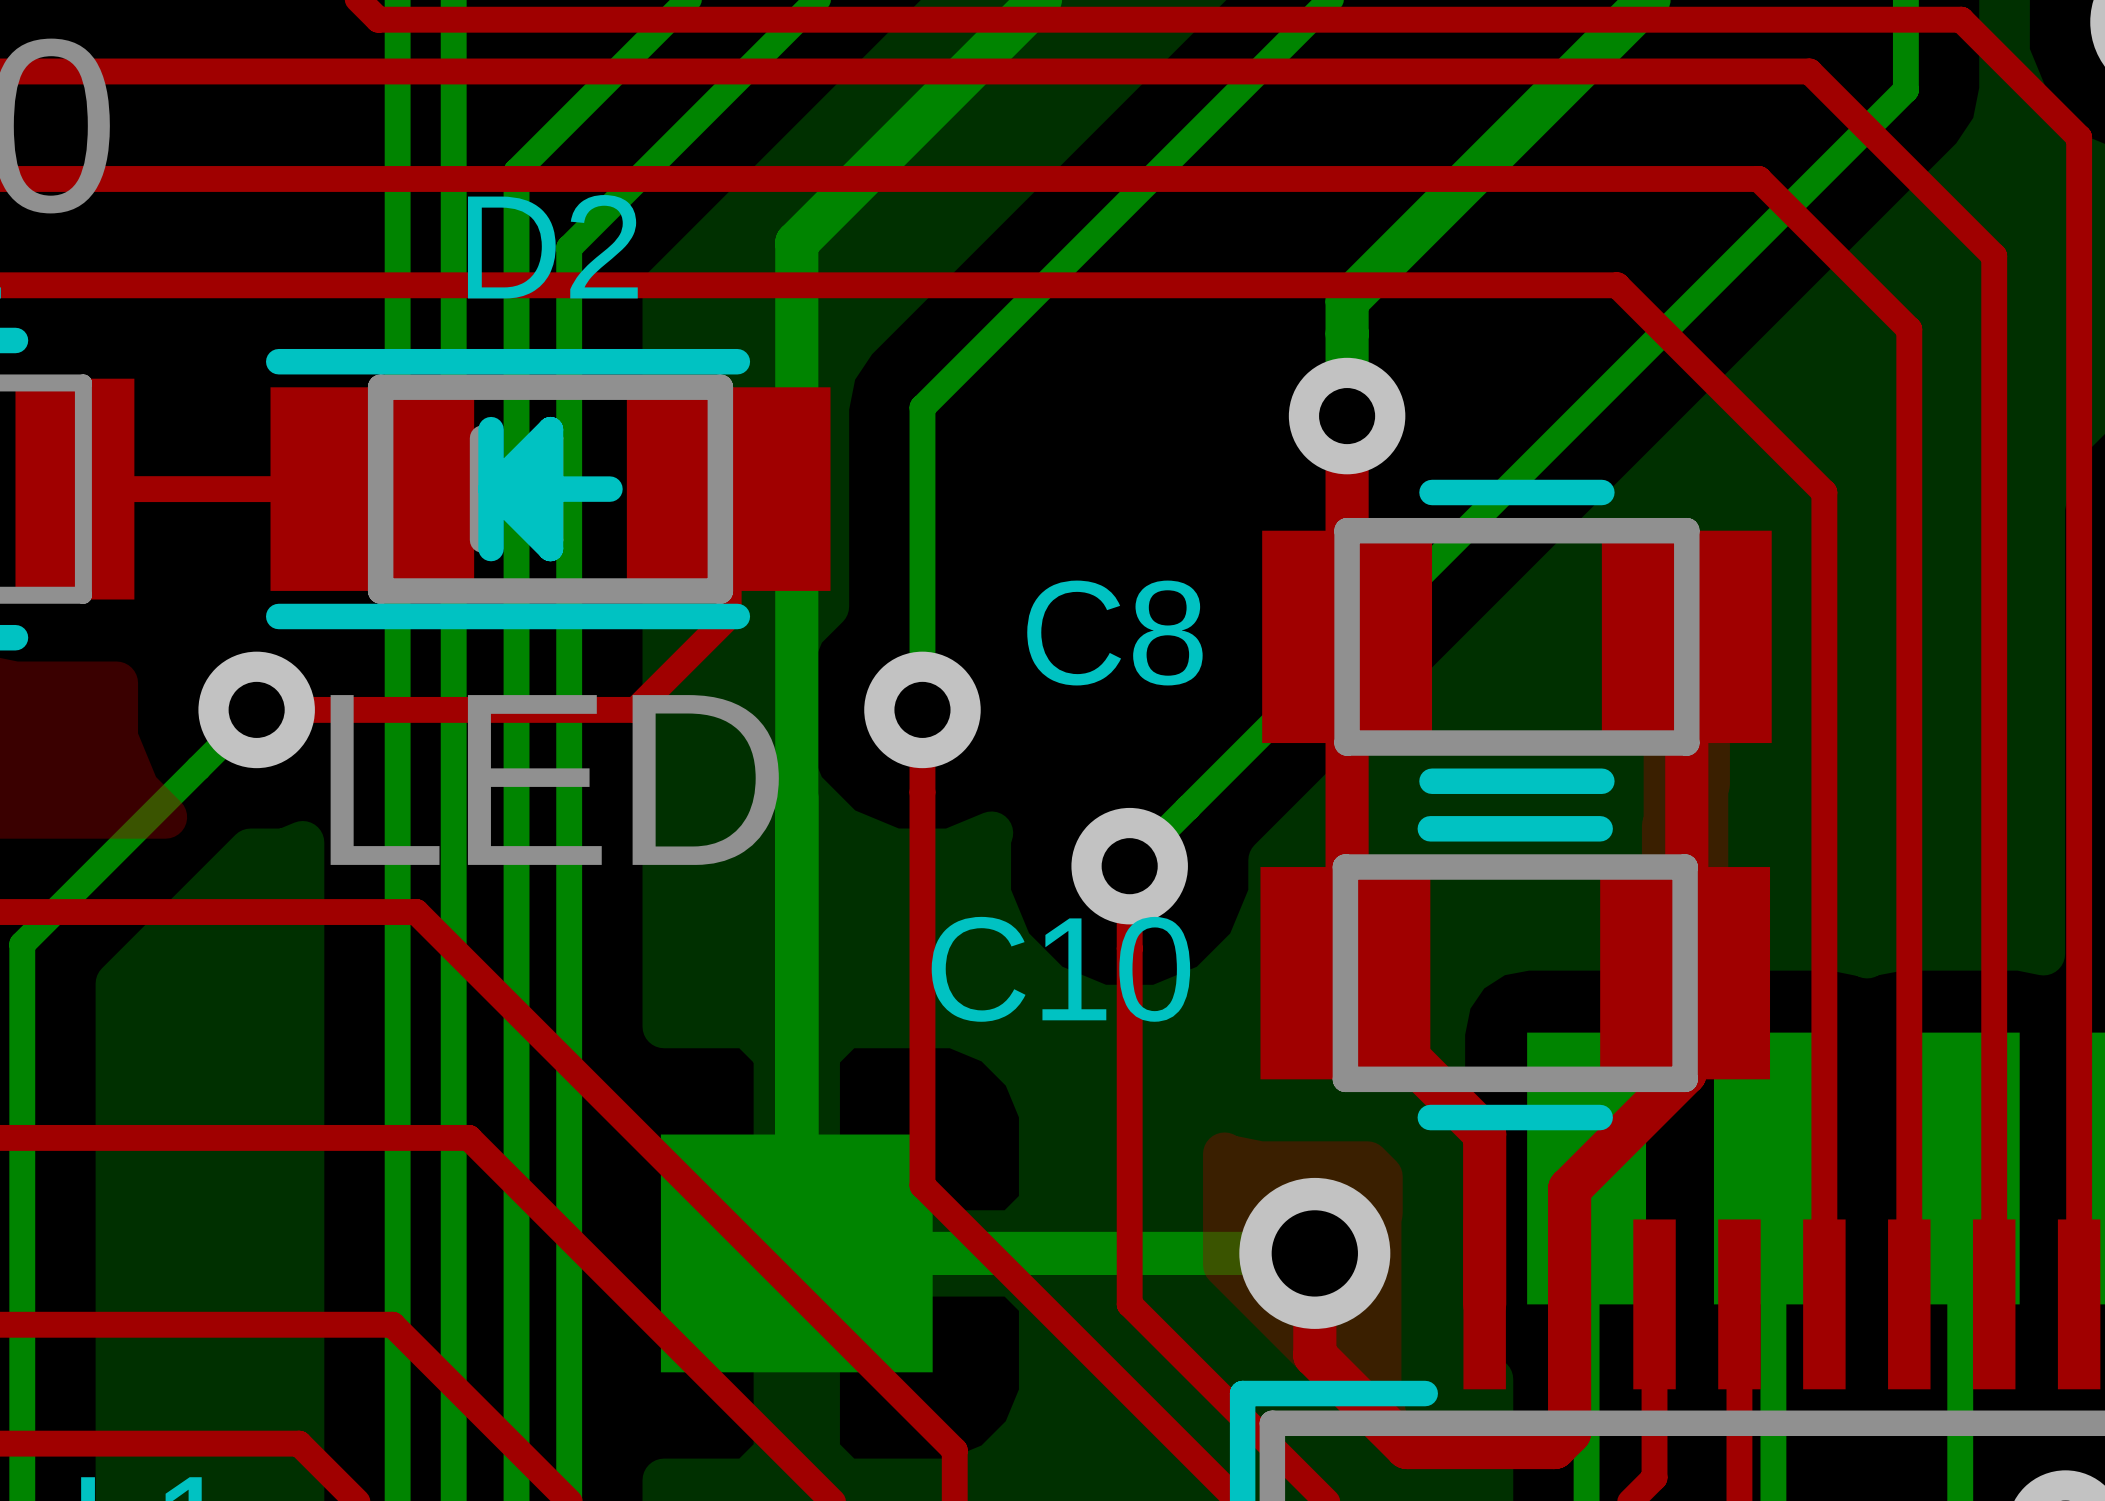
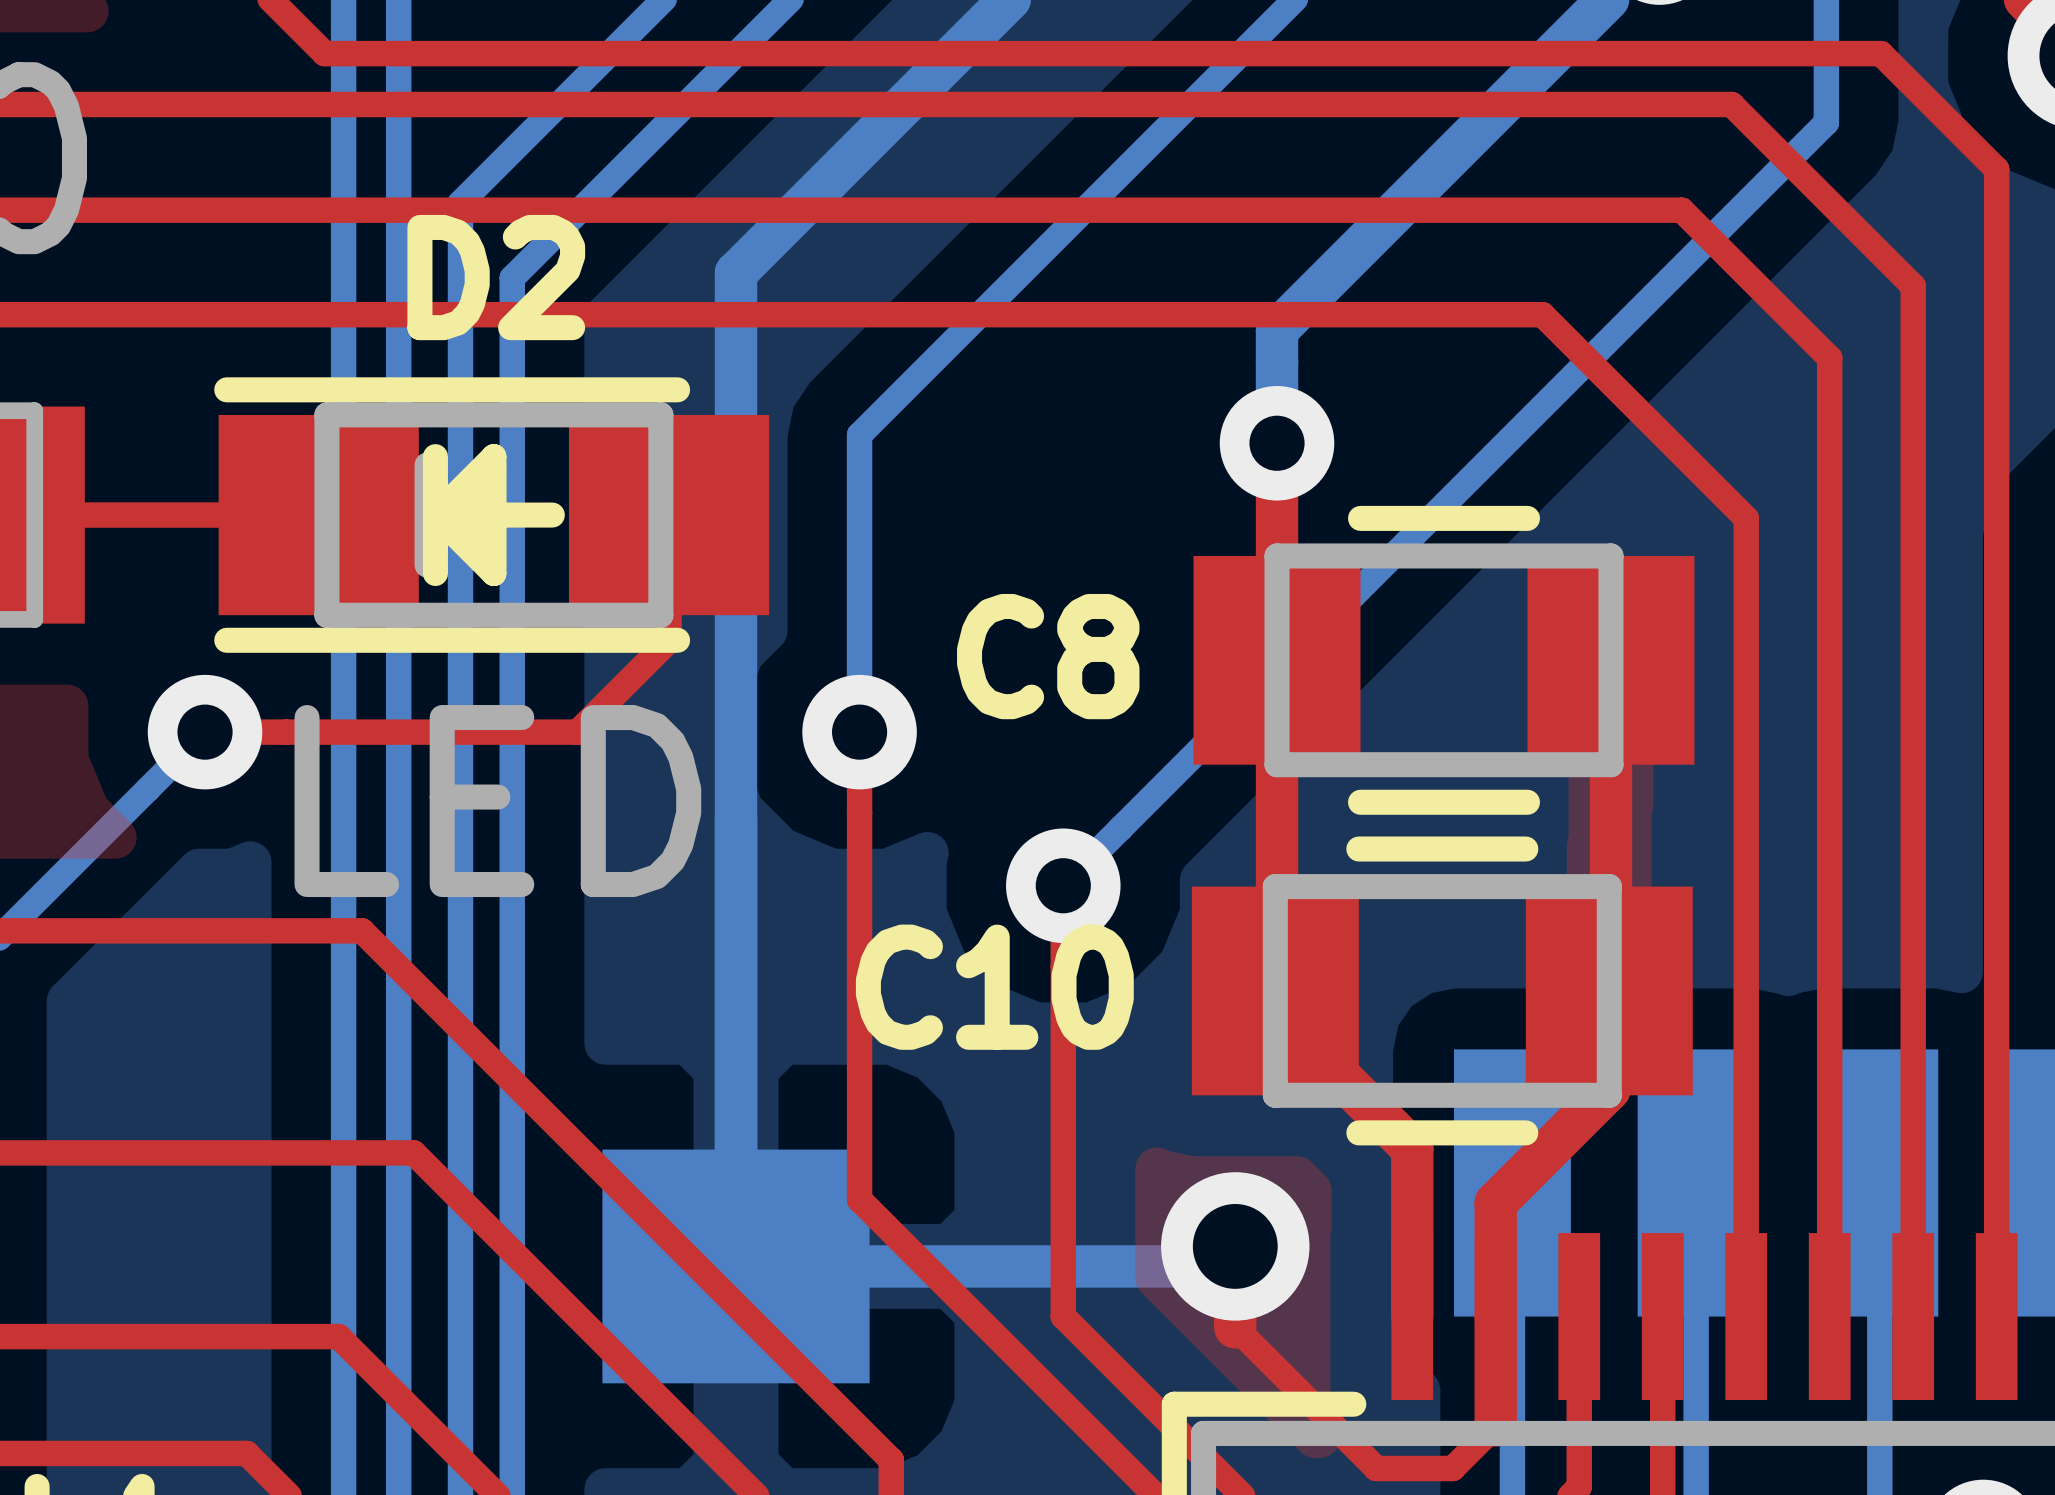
top track: (1314, 1253) (1314, 1355) (1407, 1447) (1554, 1447) (1569, 1432) (1569, 1415) -> (1235, 1246) (1235, 1327) (1376, 1468) (1452, 1468) (1495, 1425)
via position: (1314, 1253) -> (1235, 1246)

